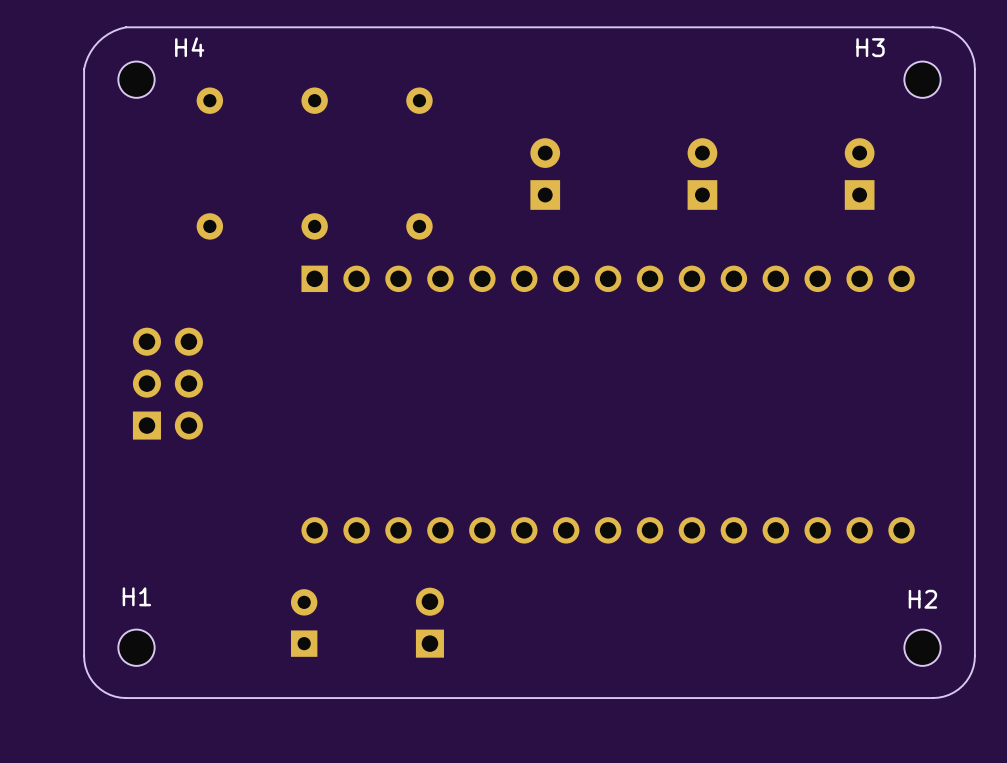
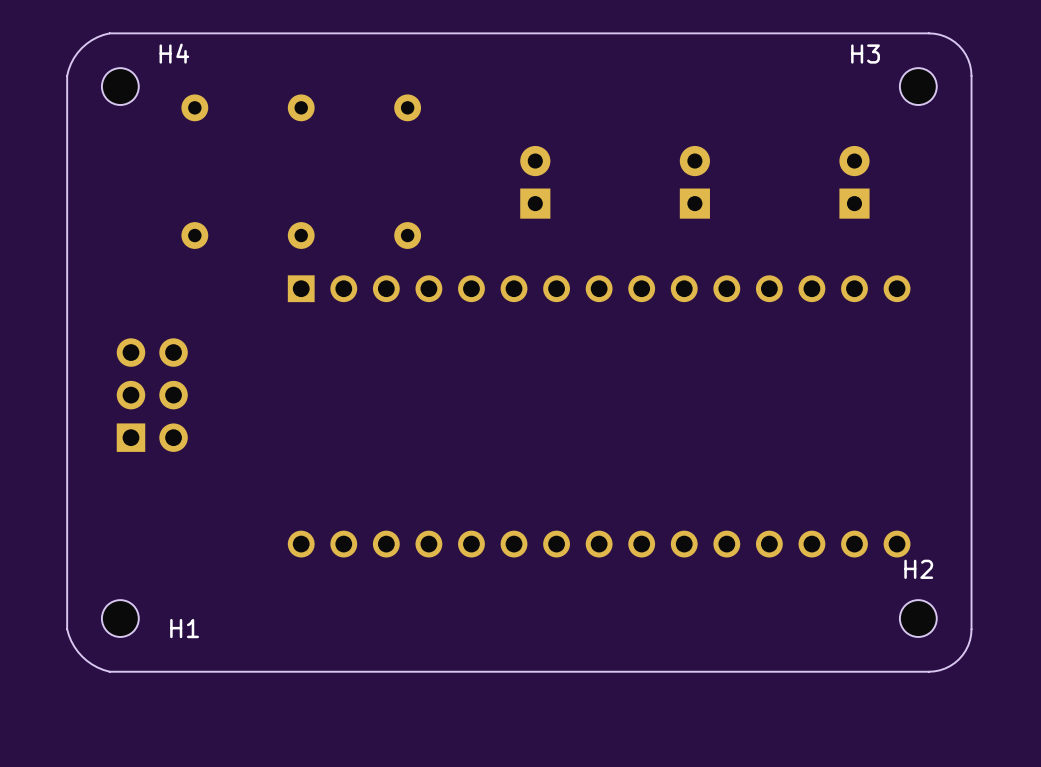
H1 name position: H1 (136, 596) -> H1 (184, 628)
board edge: (84, 614) (84, 661) (89, 677) (105, 692) (126, 698) (938, 697) (958, 689) (971, 672) (974, 656) (974, 614) -> (67, 629) (74, 646) (82, 656) (92, 664) (109, 671) (928, 671) (945, 668) (959, 659) (968, 645) (971, 629)
part: (429, 622) -> none
part: (304, 623) -> none
H1 position: (136, 647) -> (120, 618)
H2 position: (922, 647) -> (918, 618)

